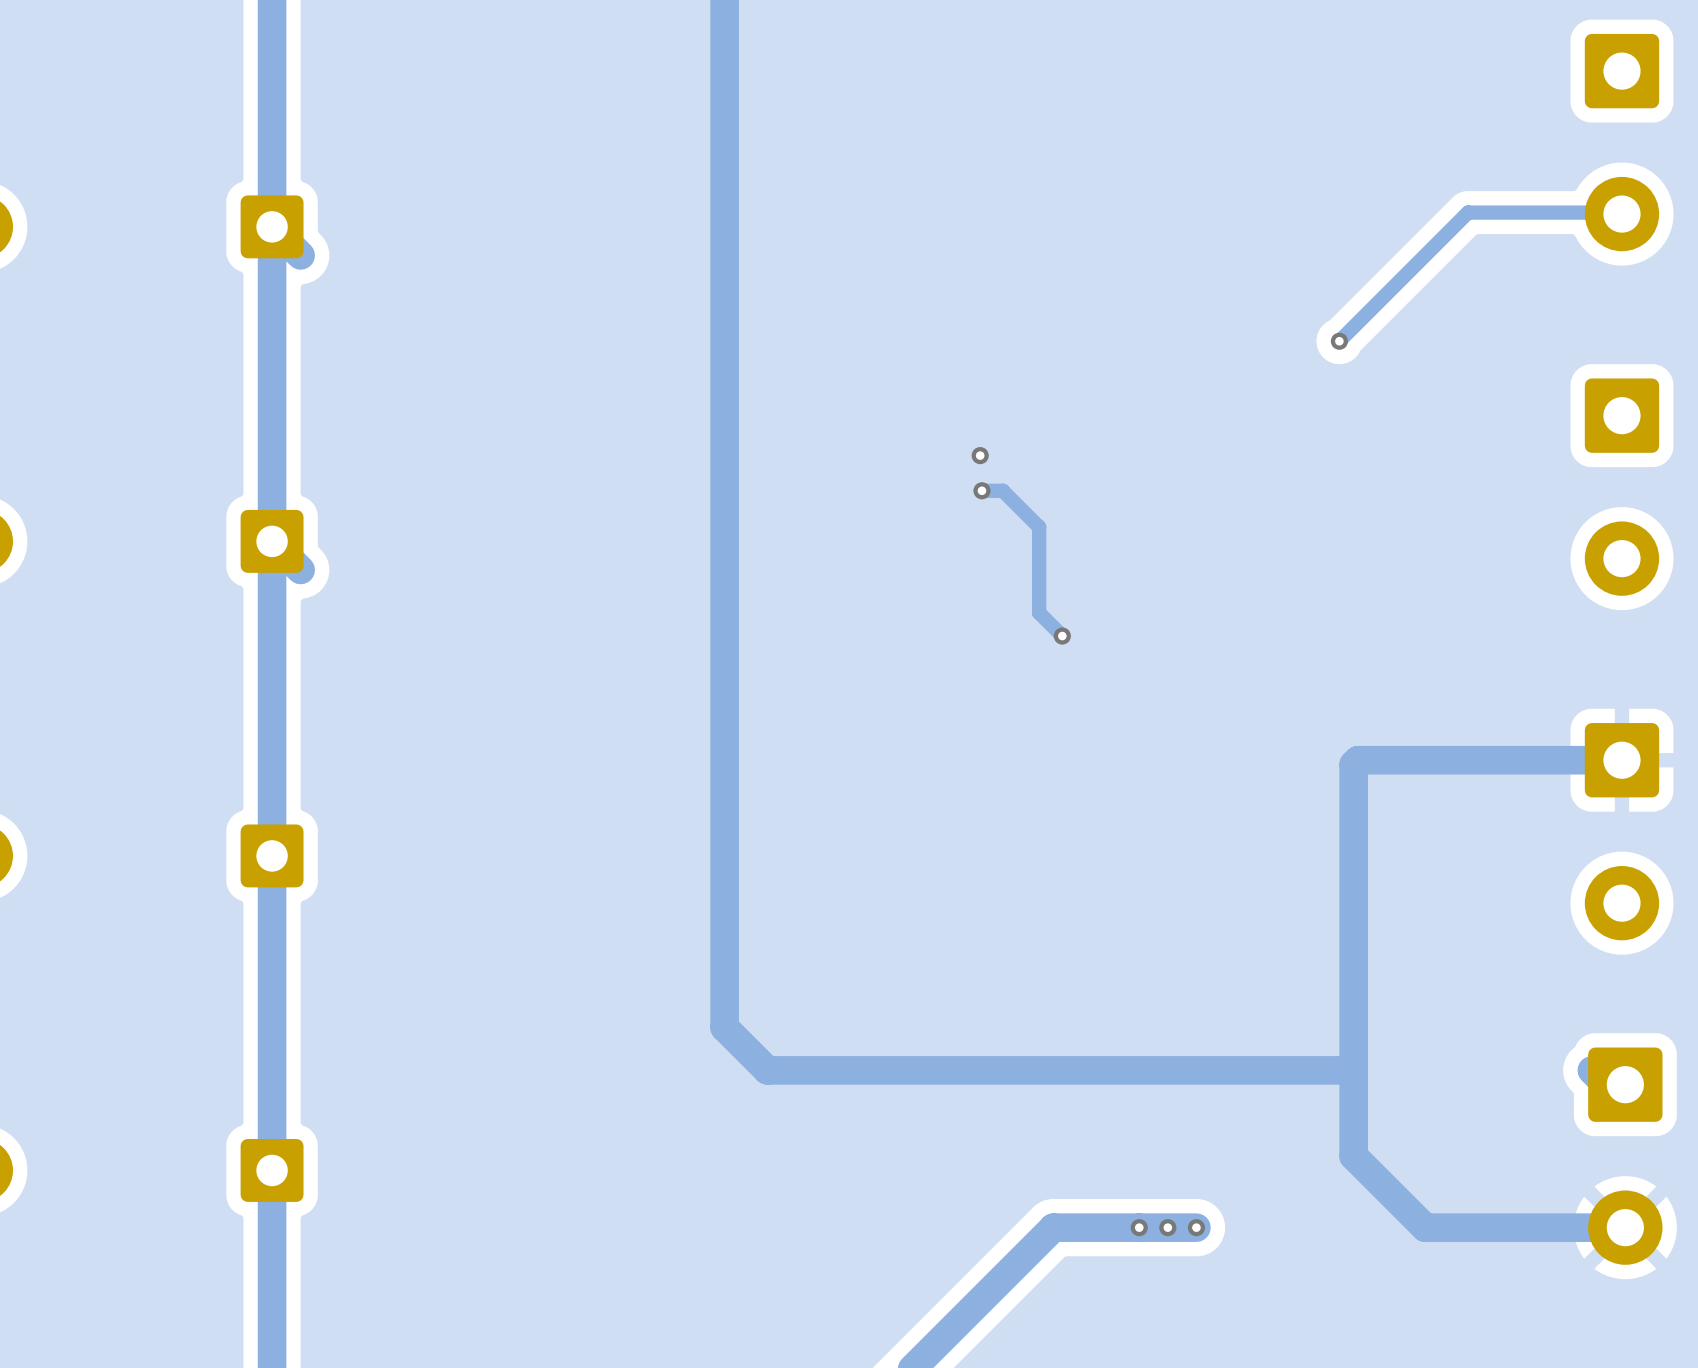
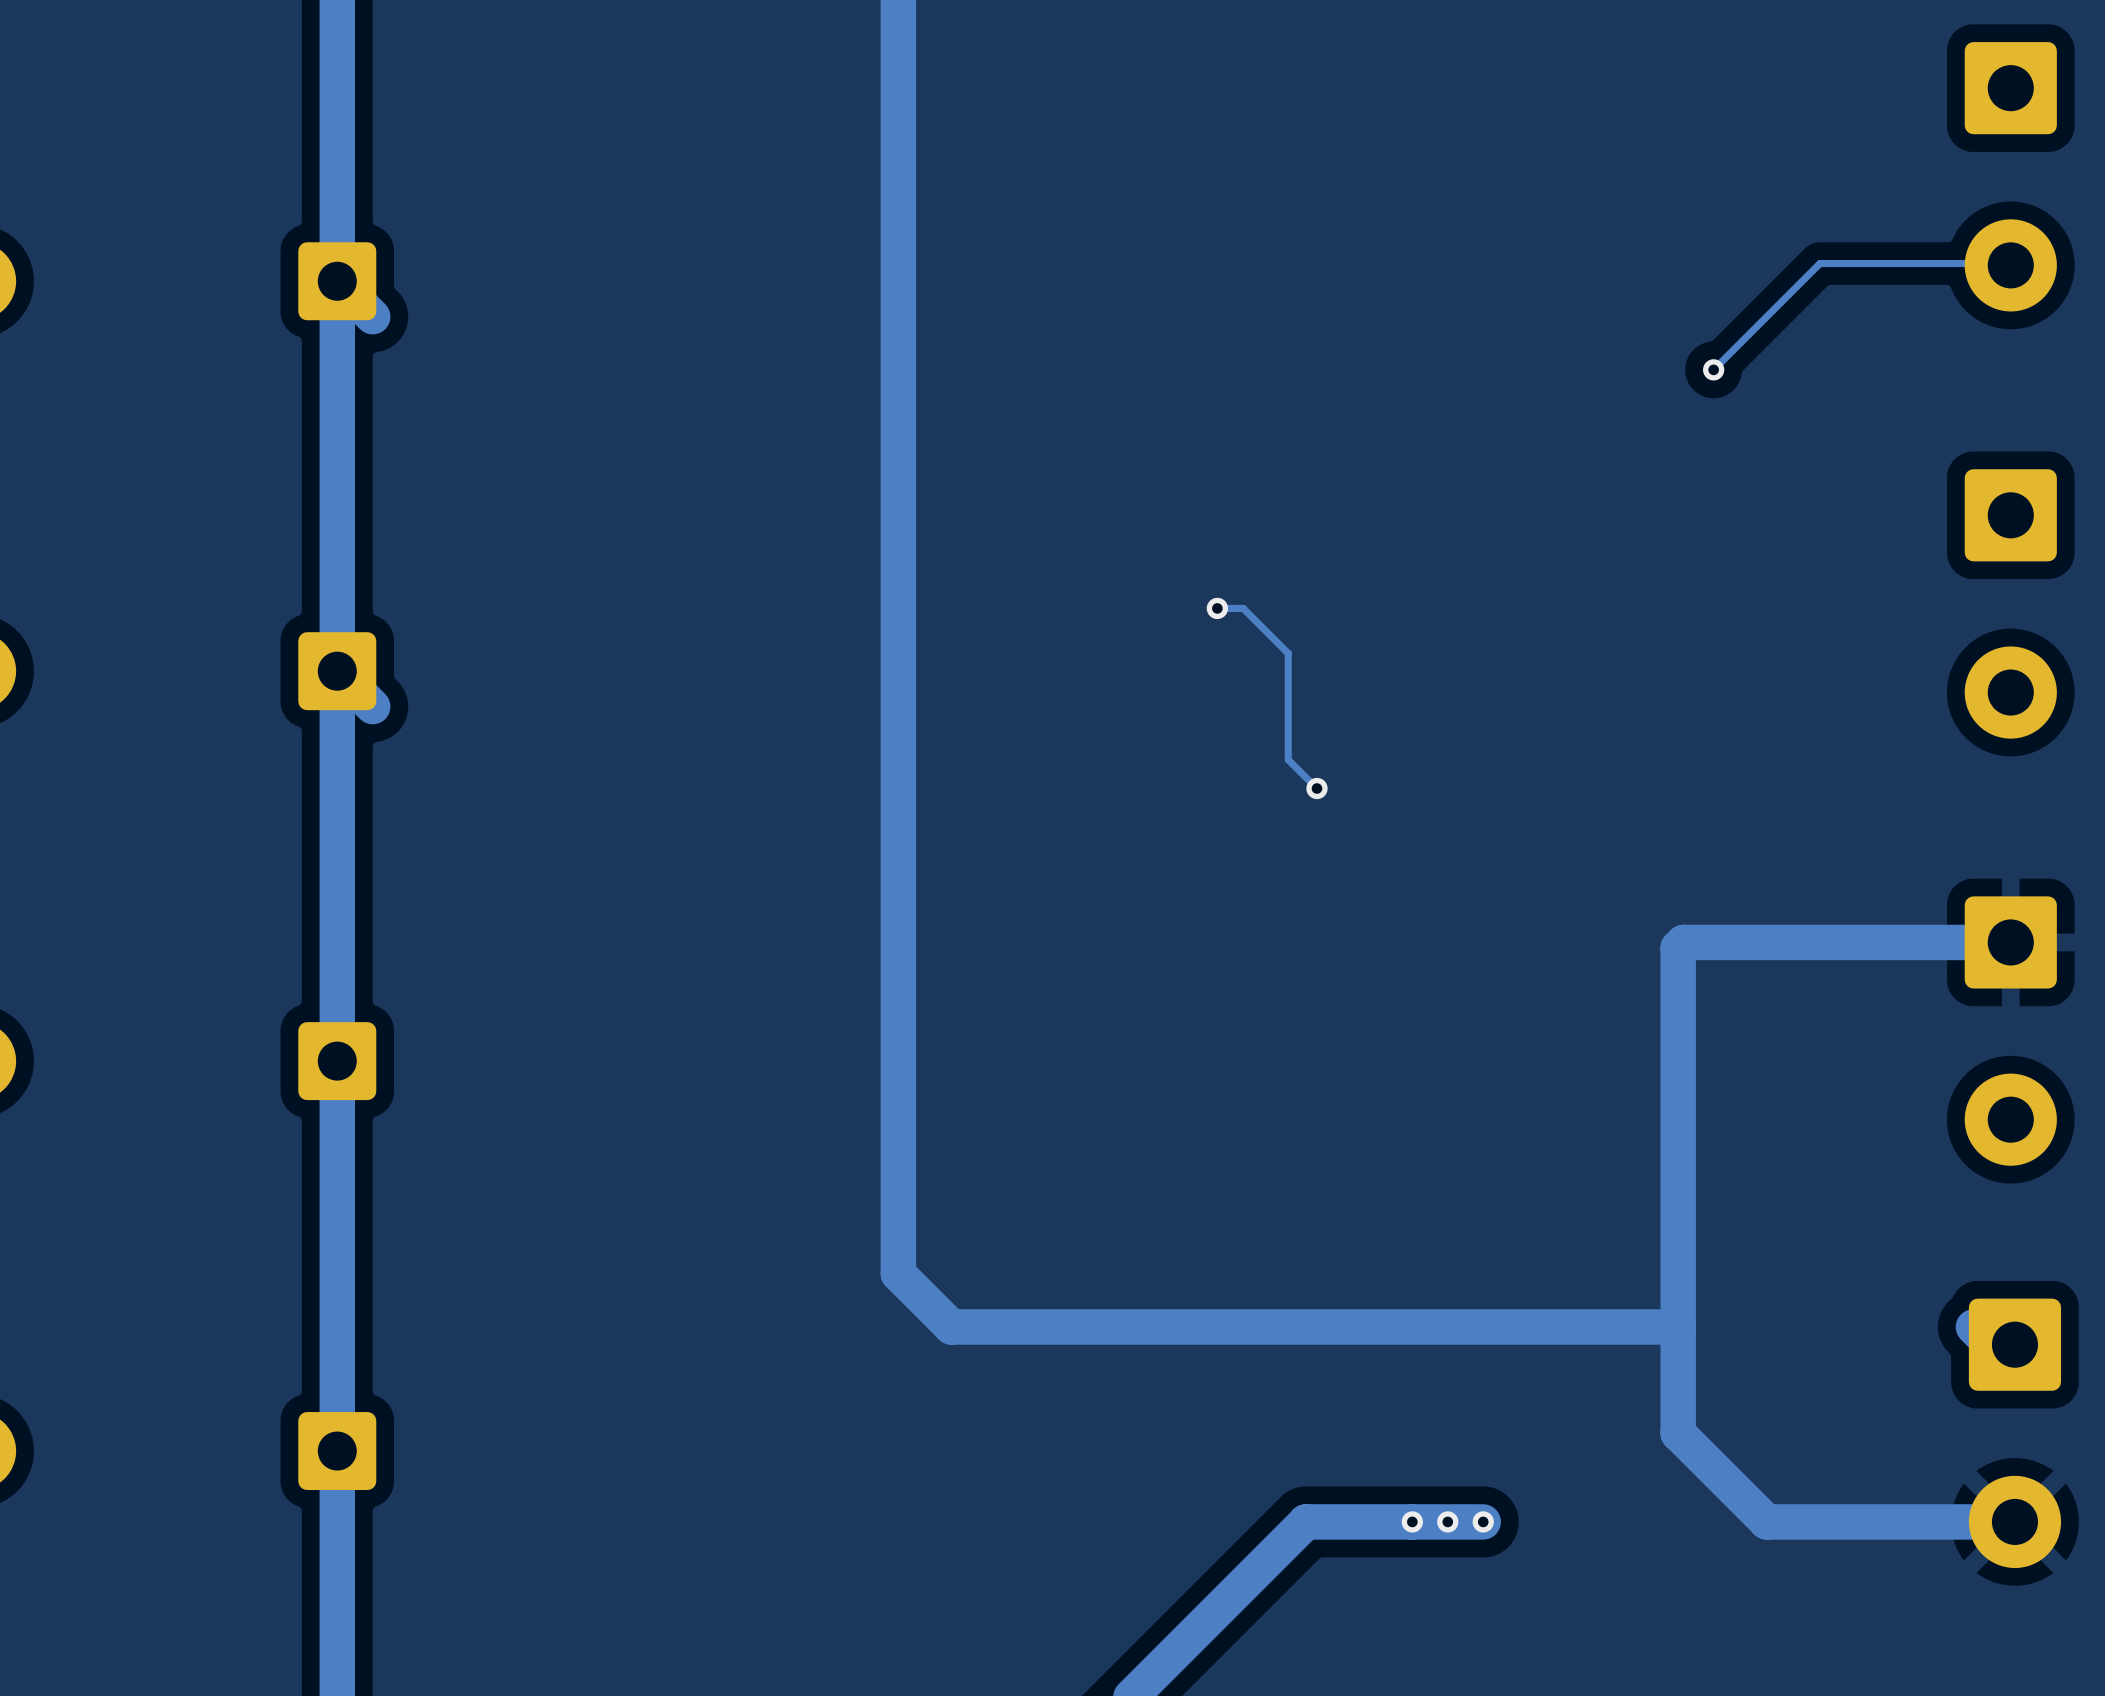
track width: thick (1621, 214) (1468, 212) (1382, 298) -> thin (2010, 265) (2008, 263) (1819, 263) (1713, 369)
track: (1382, 298) (1339, 341) -> none
via position: (1339, 341) -> (1713, 369)
via: (980, 455) -> none
track width: thick (981, 490) (1002, 490) (1039, 527) (1039, 612) (1062, 636) -> thin (1217, 608) (1243, 608) (1288, 653) (1288, 759) (1316, 788)

